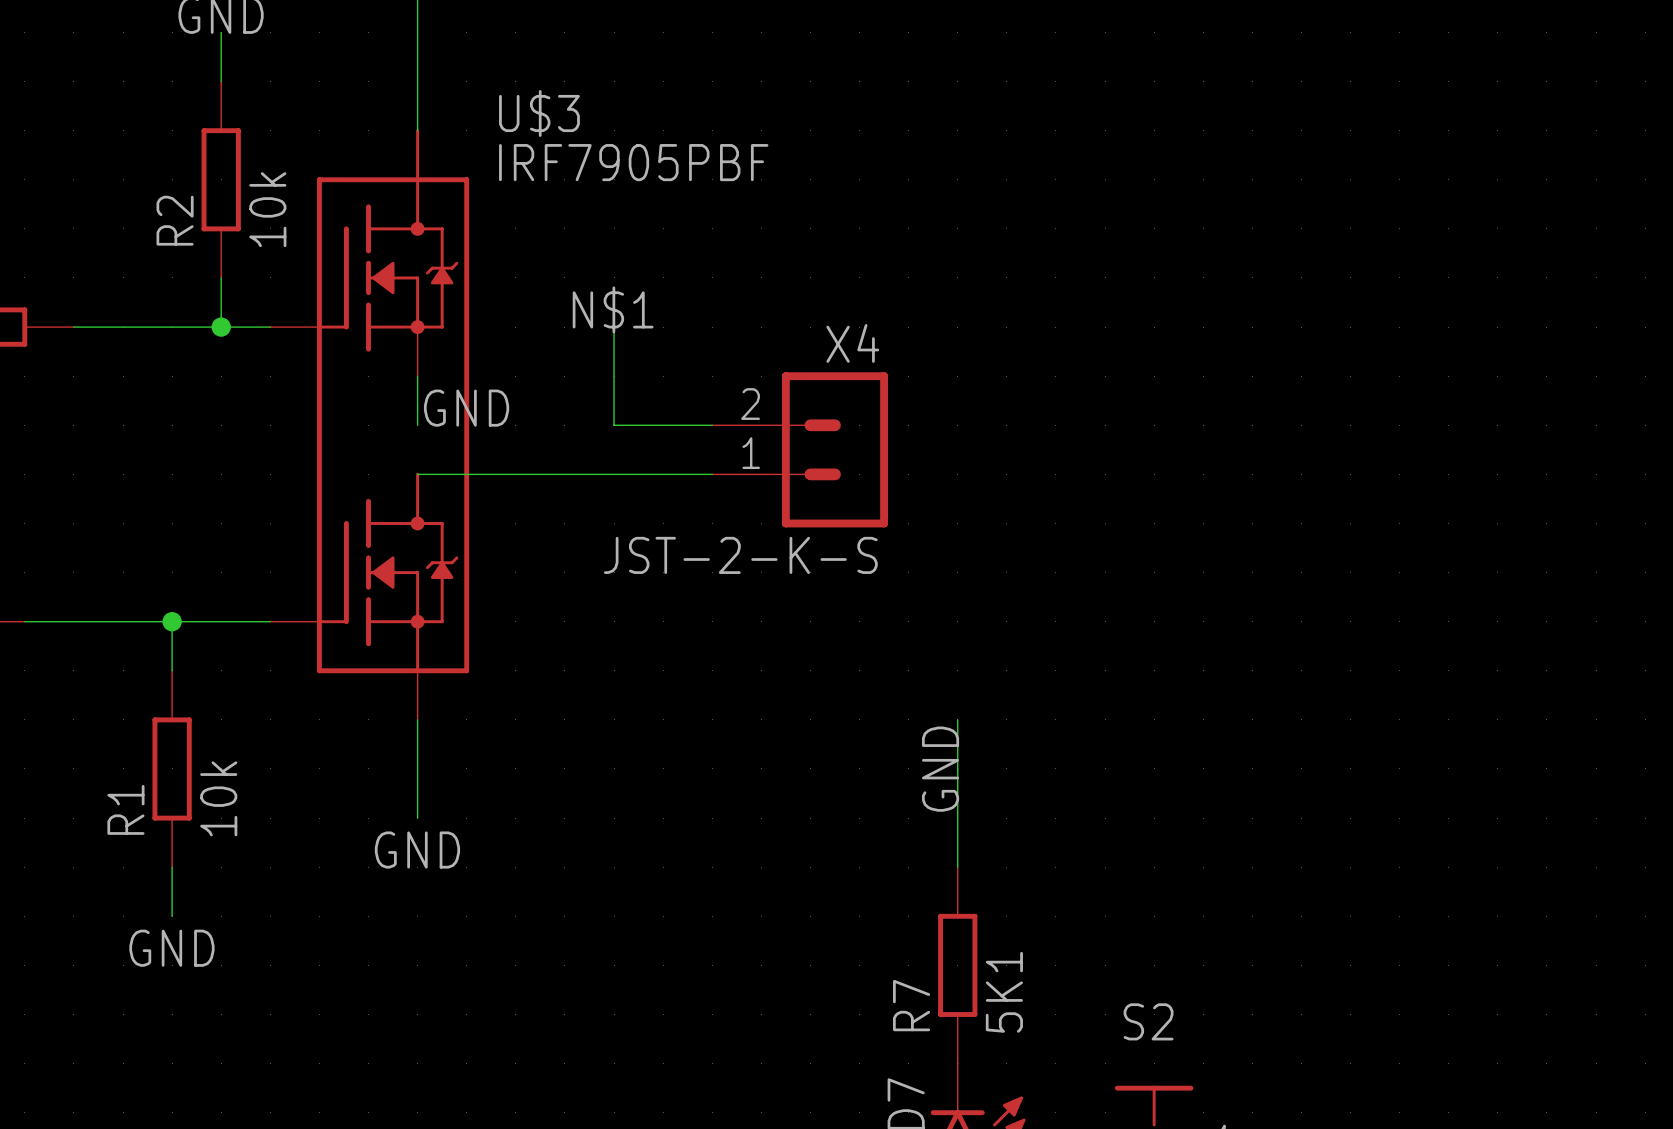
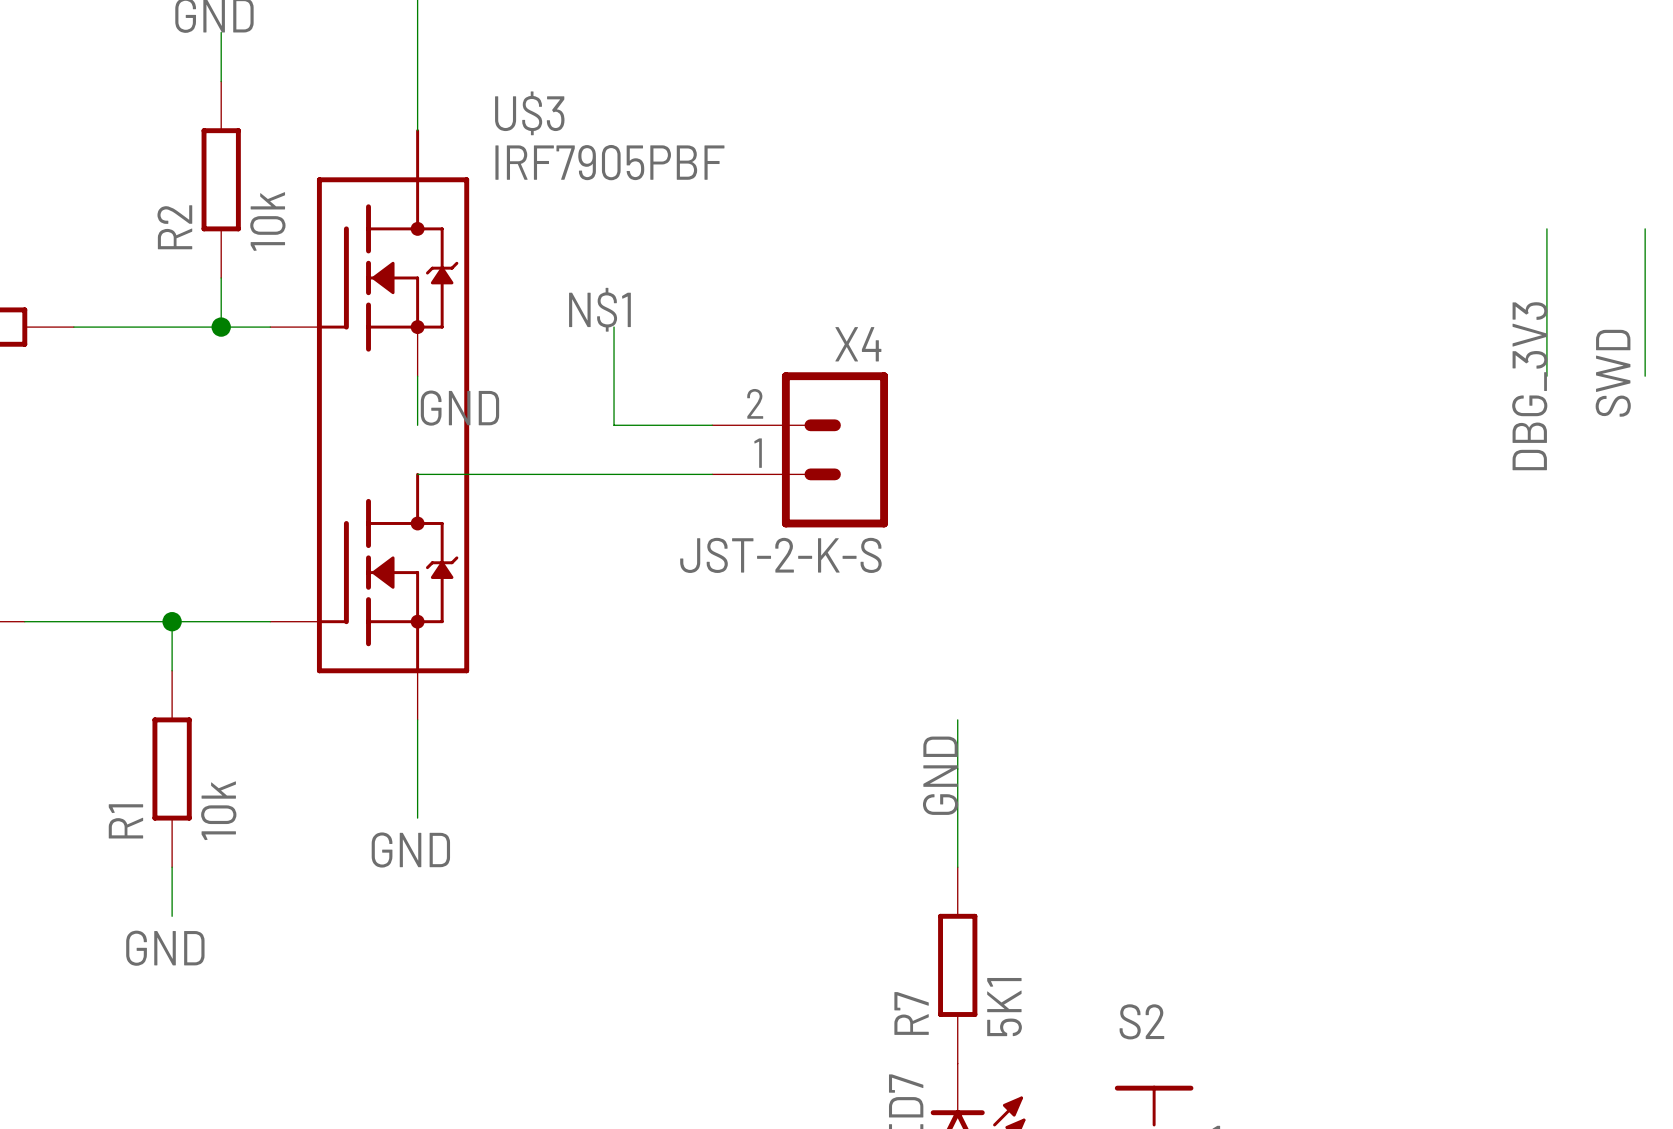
wire: none -> (1546, 228) (1546, 376)
wire: none -> (1645, 228) (1645, 376)
label: none -> DBG_3V3 (1529, 386)
label: none -> SWD (1613, 373)

